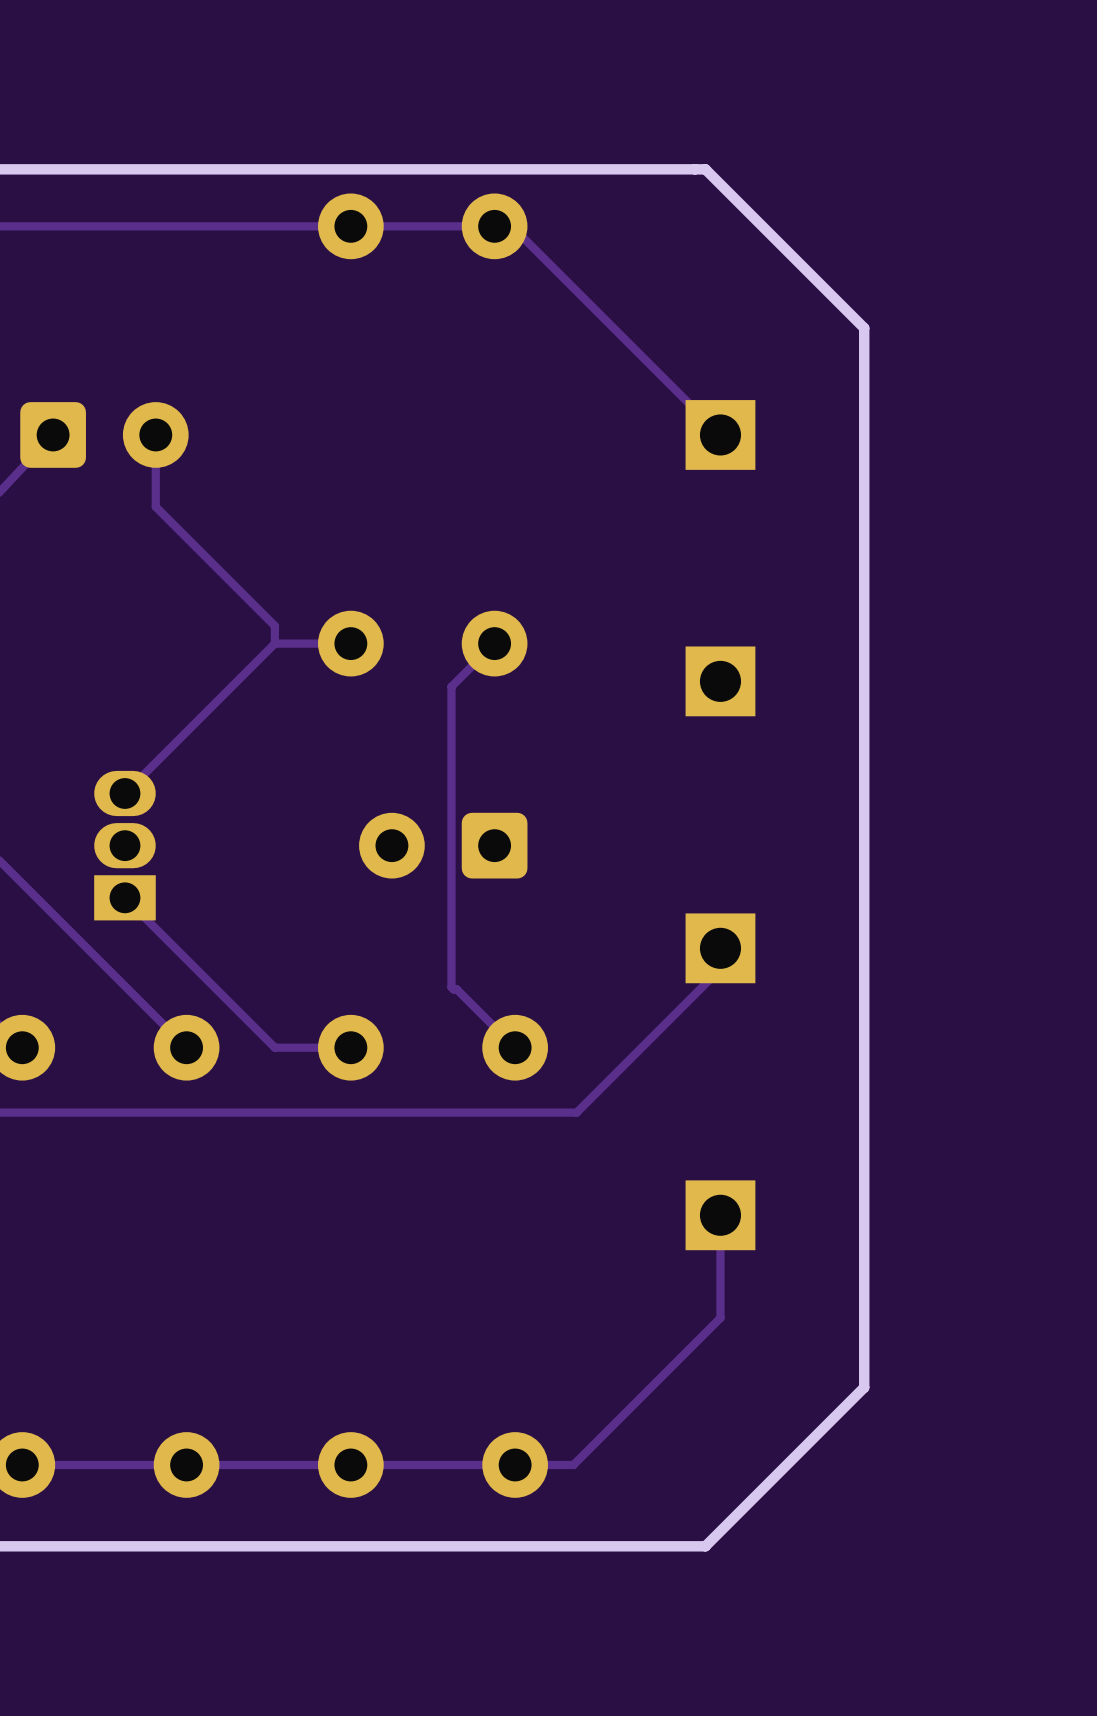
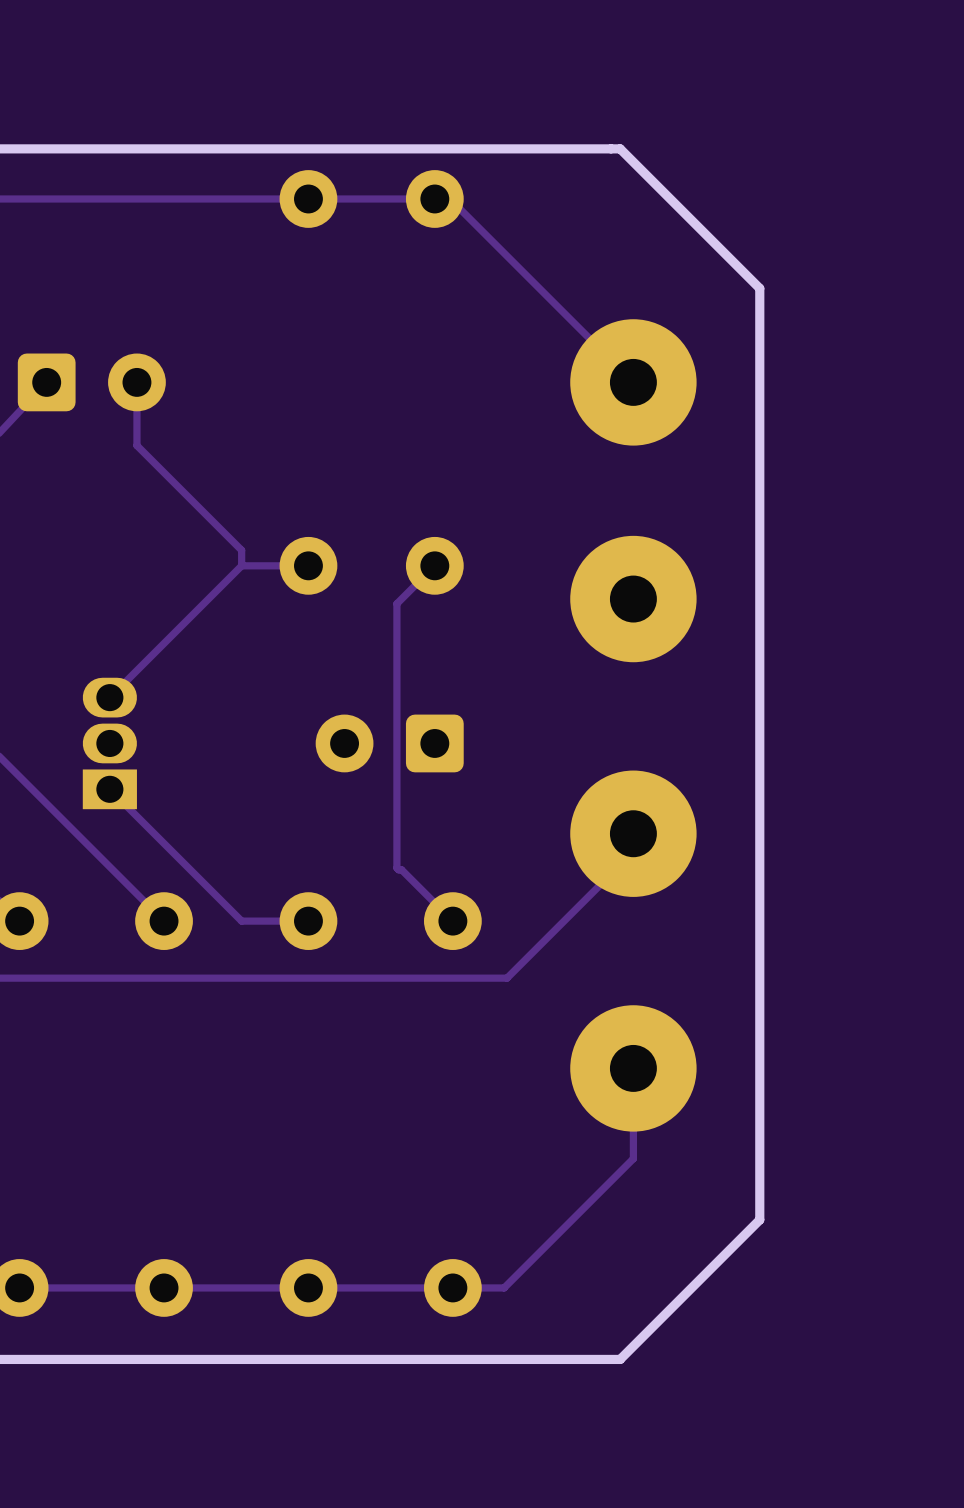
part footprint: [685, 400, 756, 470] -> [570, 319, 697, 446]
part footprint: [685, 646, 756, 717] -> [570, 535, 697, 663]
part footprint: [685, 913, 756, 984] -> [570, 770, 697, 897]
part footprint: [685, 1180, 756, 1251] -> [570, 1005, 697, 1132]

